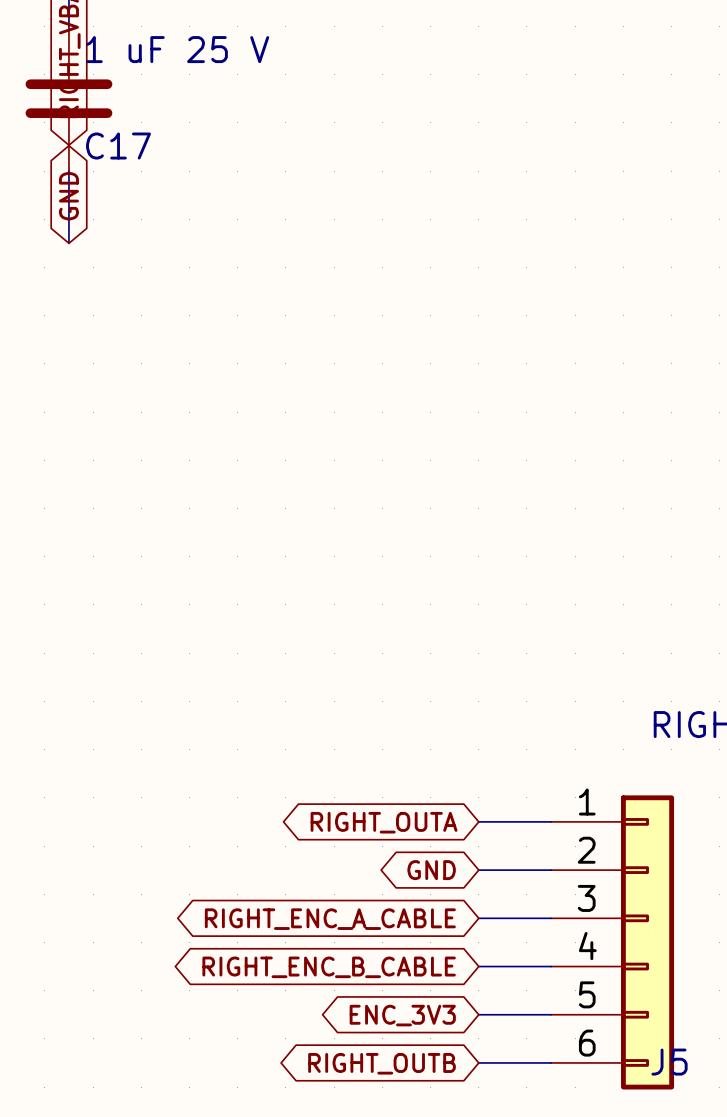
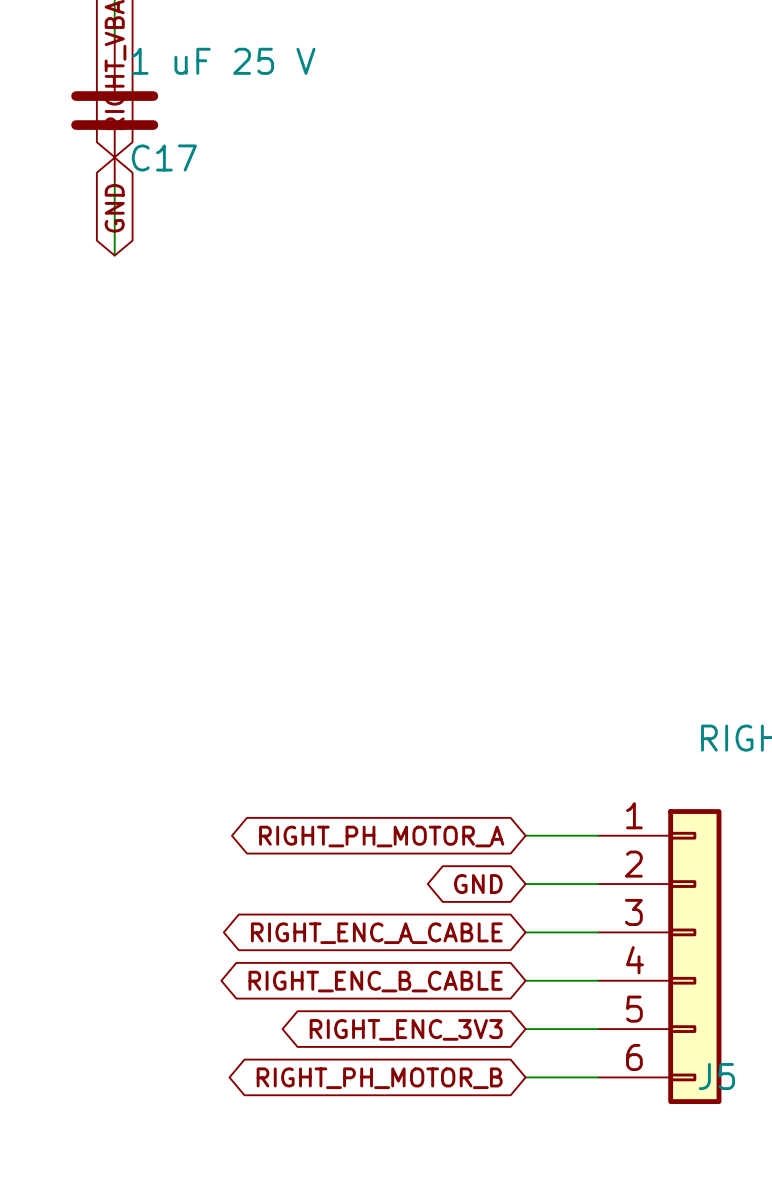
global label: RIGHT_OUTA (384, 822) -> RIGHT_PH_MOTOR_A (381, 836)
global label: ENC_3V3 (402, 1015) -> RIGHT_ENC_3V3 (406, 1029)
global label: RIGHT_OUTB (382, 1063) -> RIGHT_PH_MOTOR_B (379, 1078)

